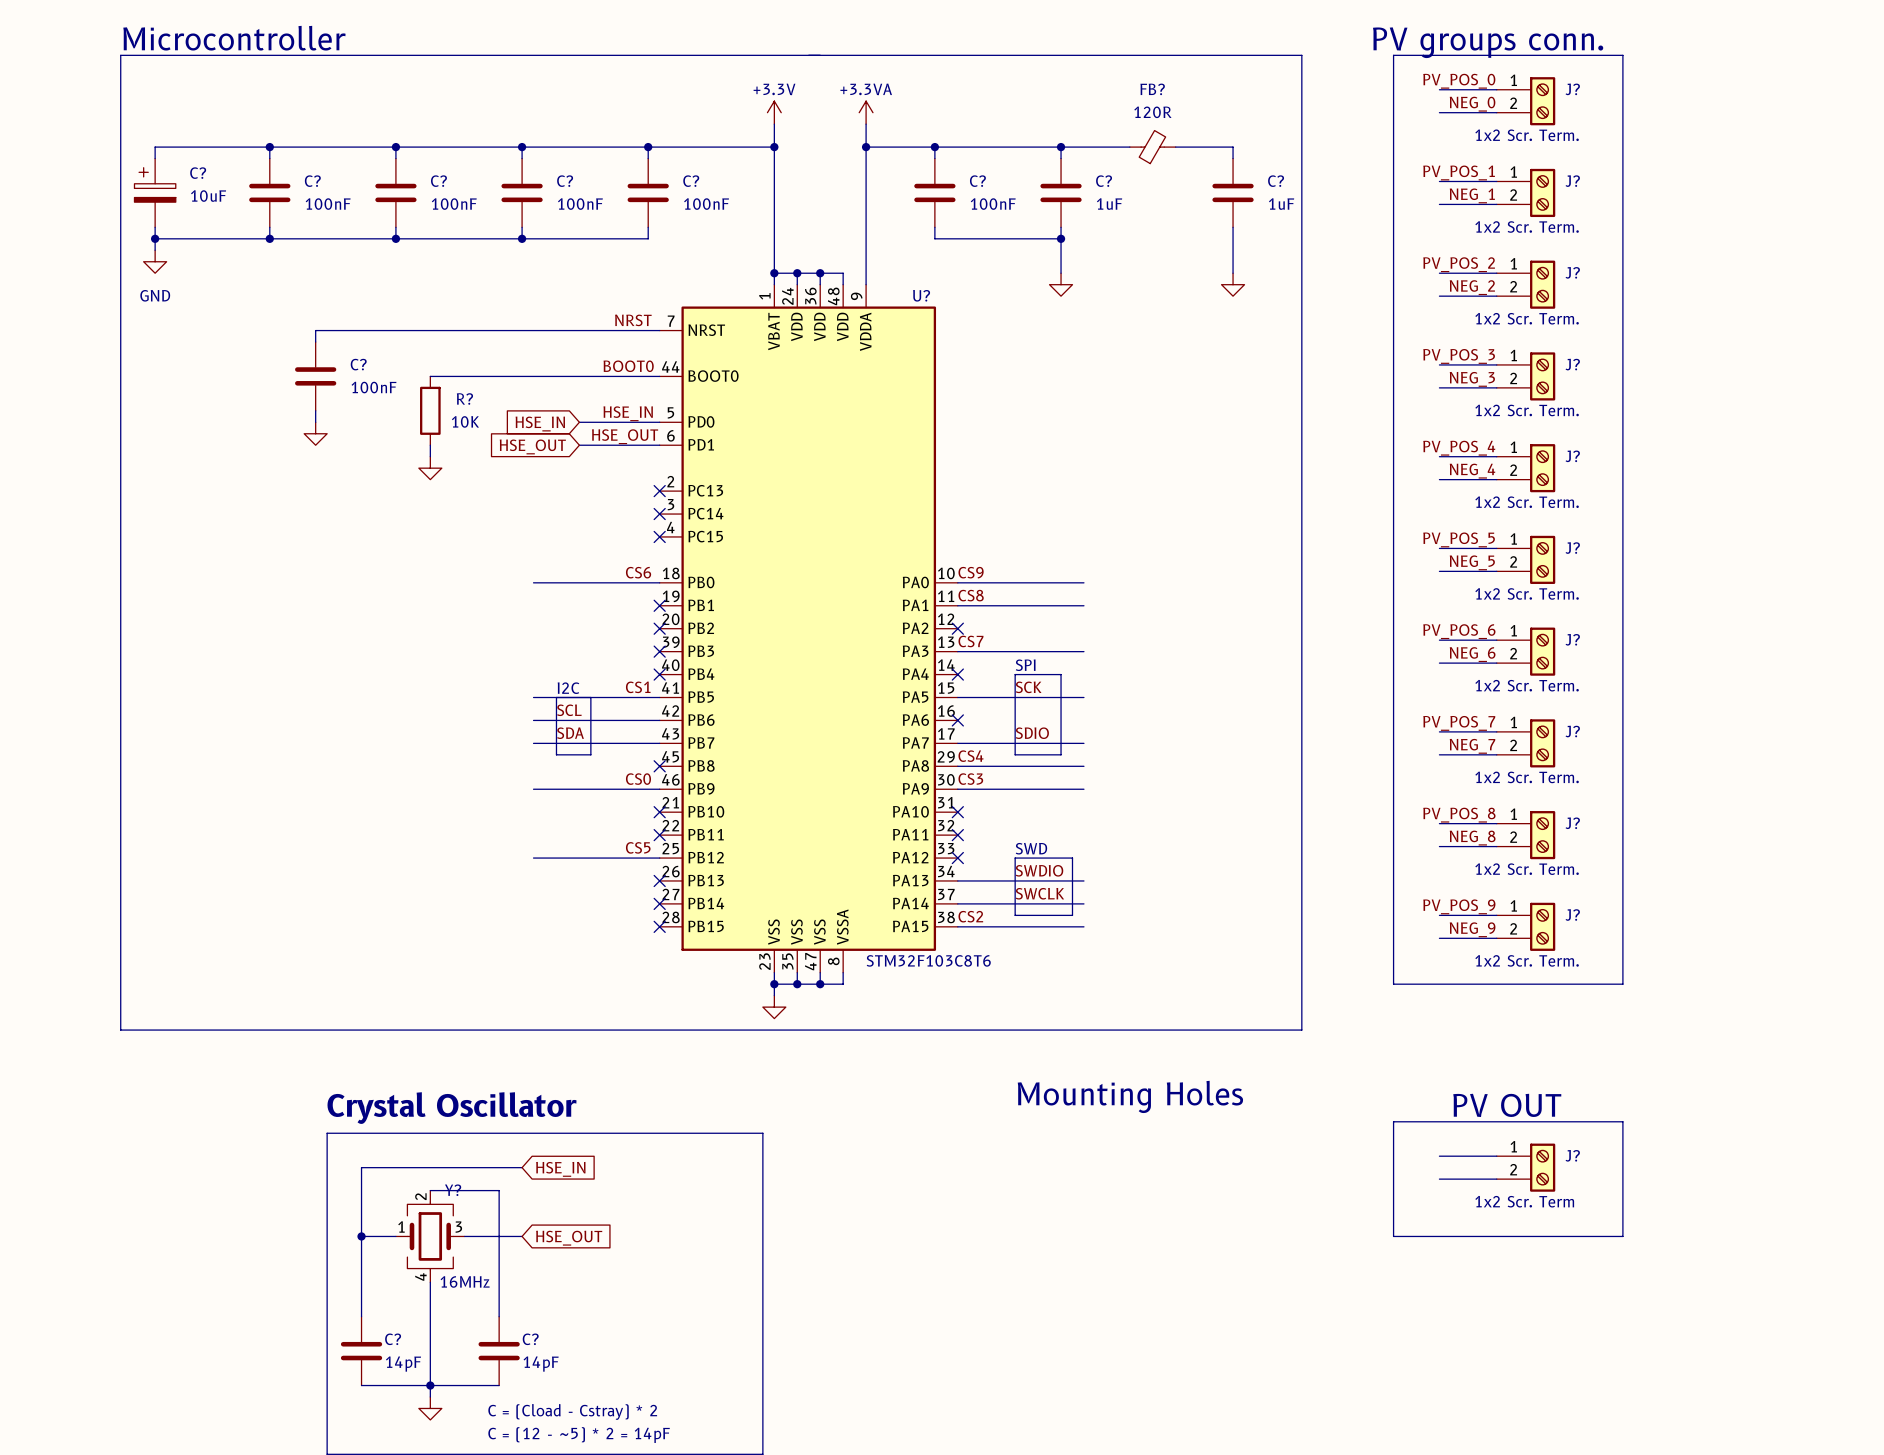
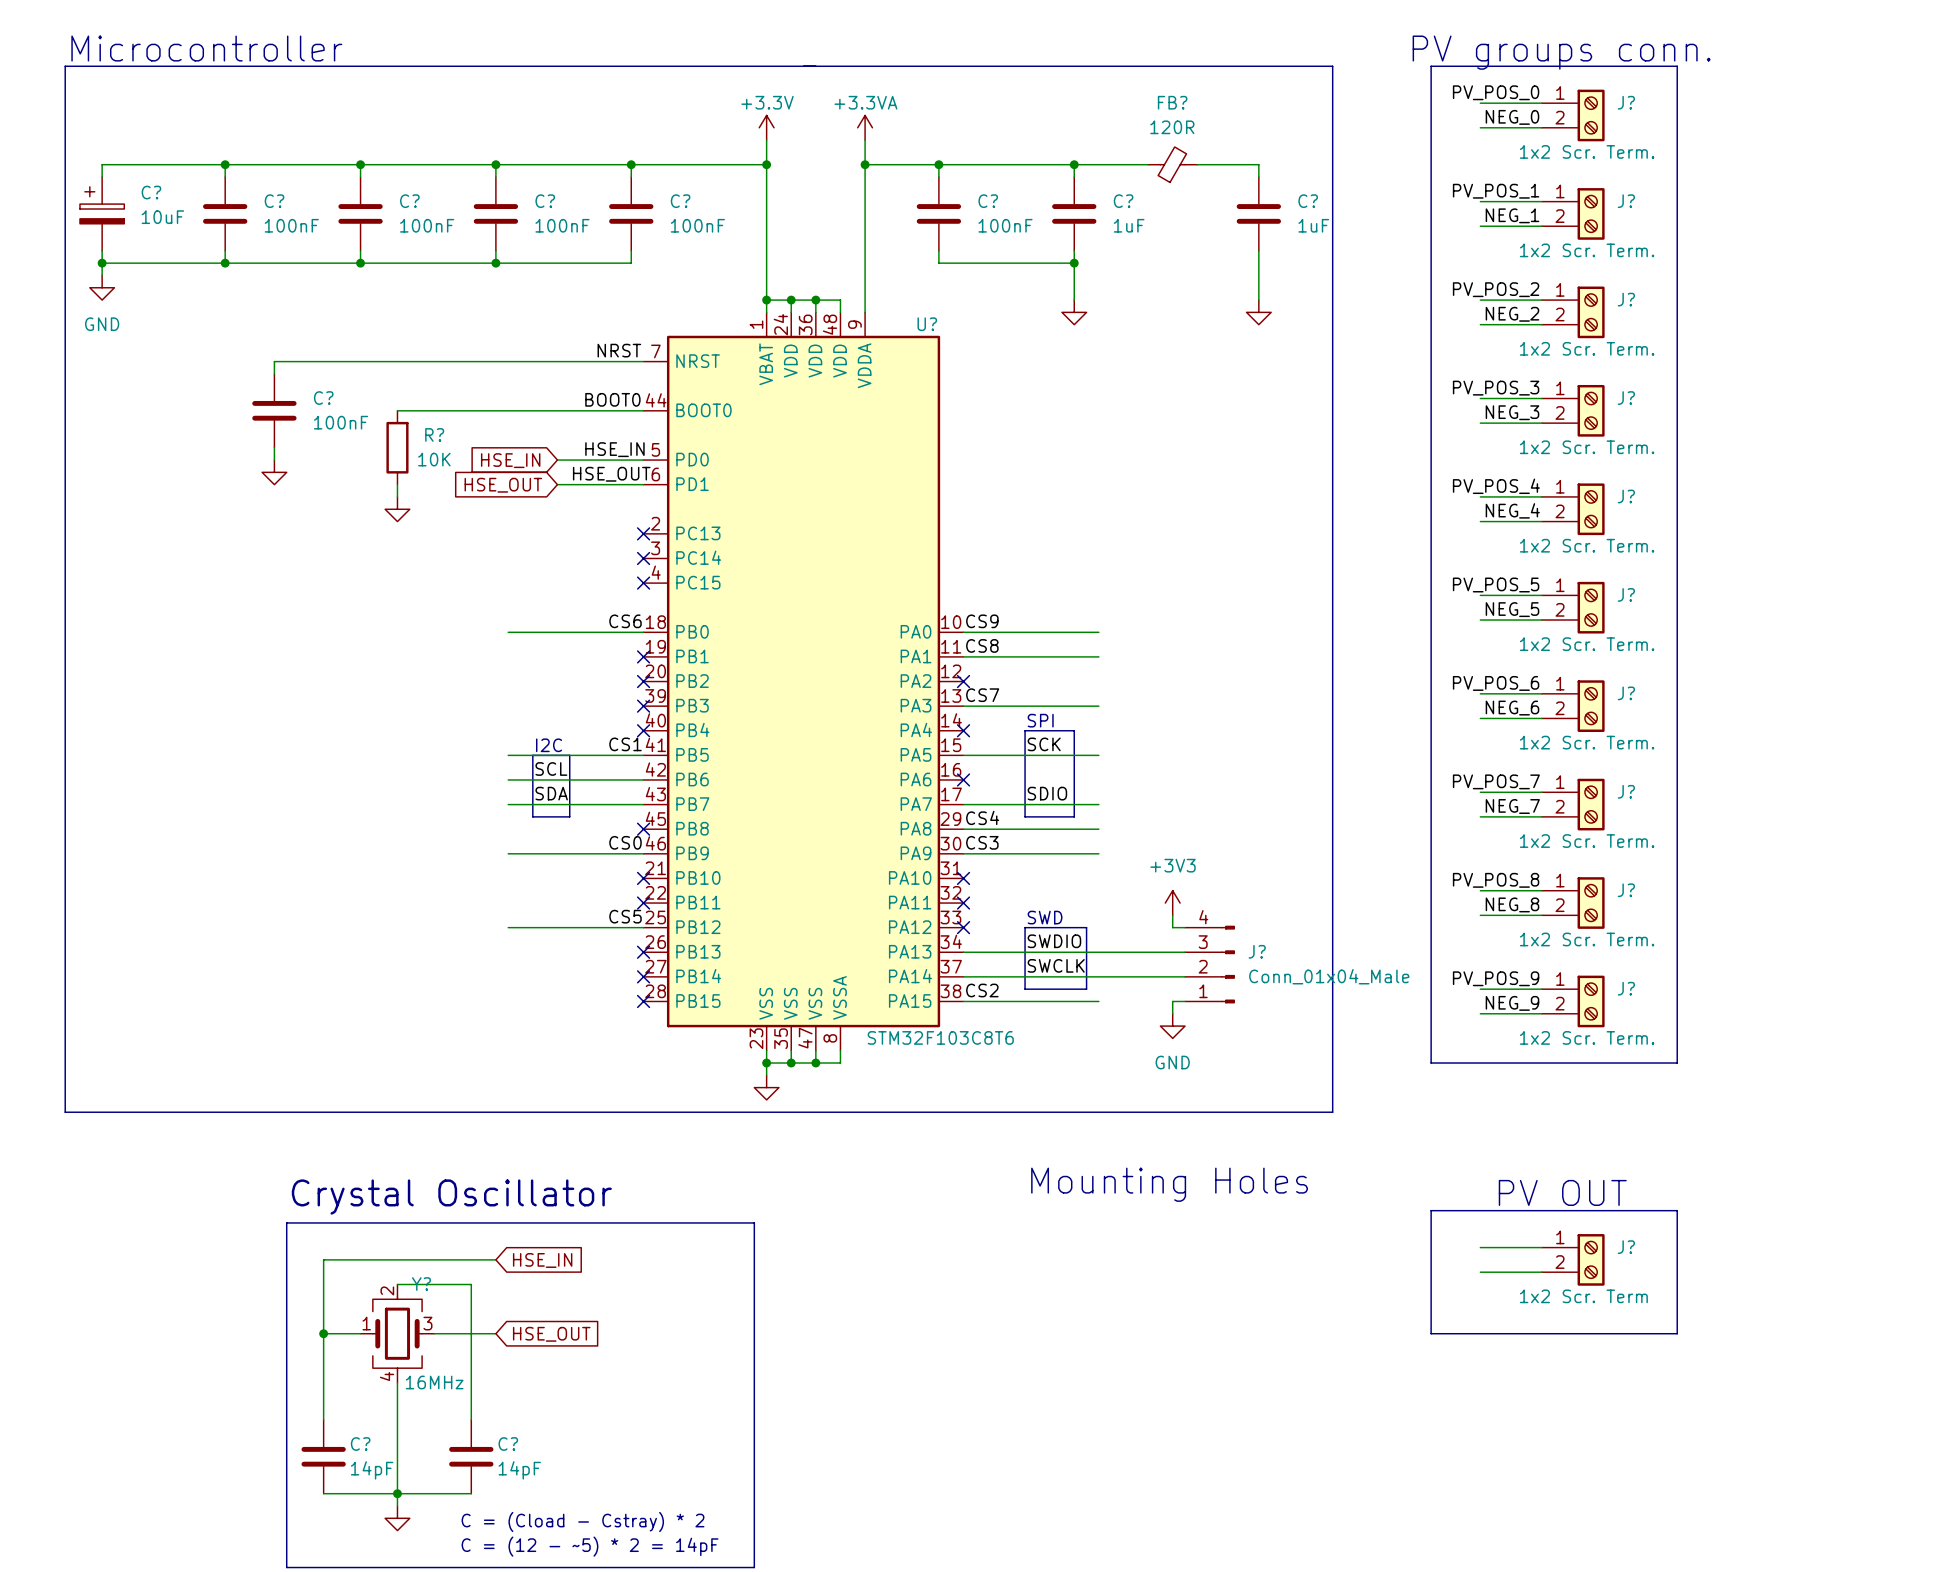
power symbol: none -> +3V3 (1172, 903)
wire: none -> (1172, 915) (1172, 927) (1185, 927)
wire: none -> (1098, 952) (1185, 952)
J?: none -> Conn_01x04_Male (1209, 964)
wire: none -> (1098, 976) (1185, 976)
wire: none -> (1185, 1001) (1172, 1001) (1172, 1013)
power symbol: none -> GND (1172, 1026)

